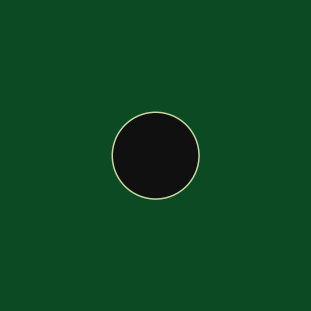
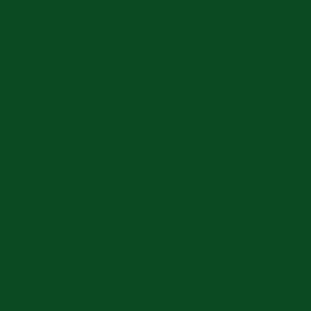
part: (155, 155) -> none

